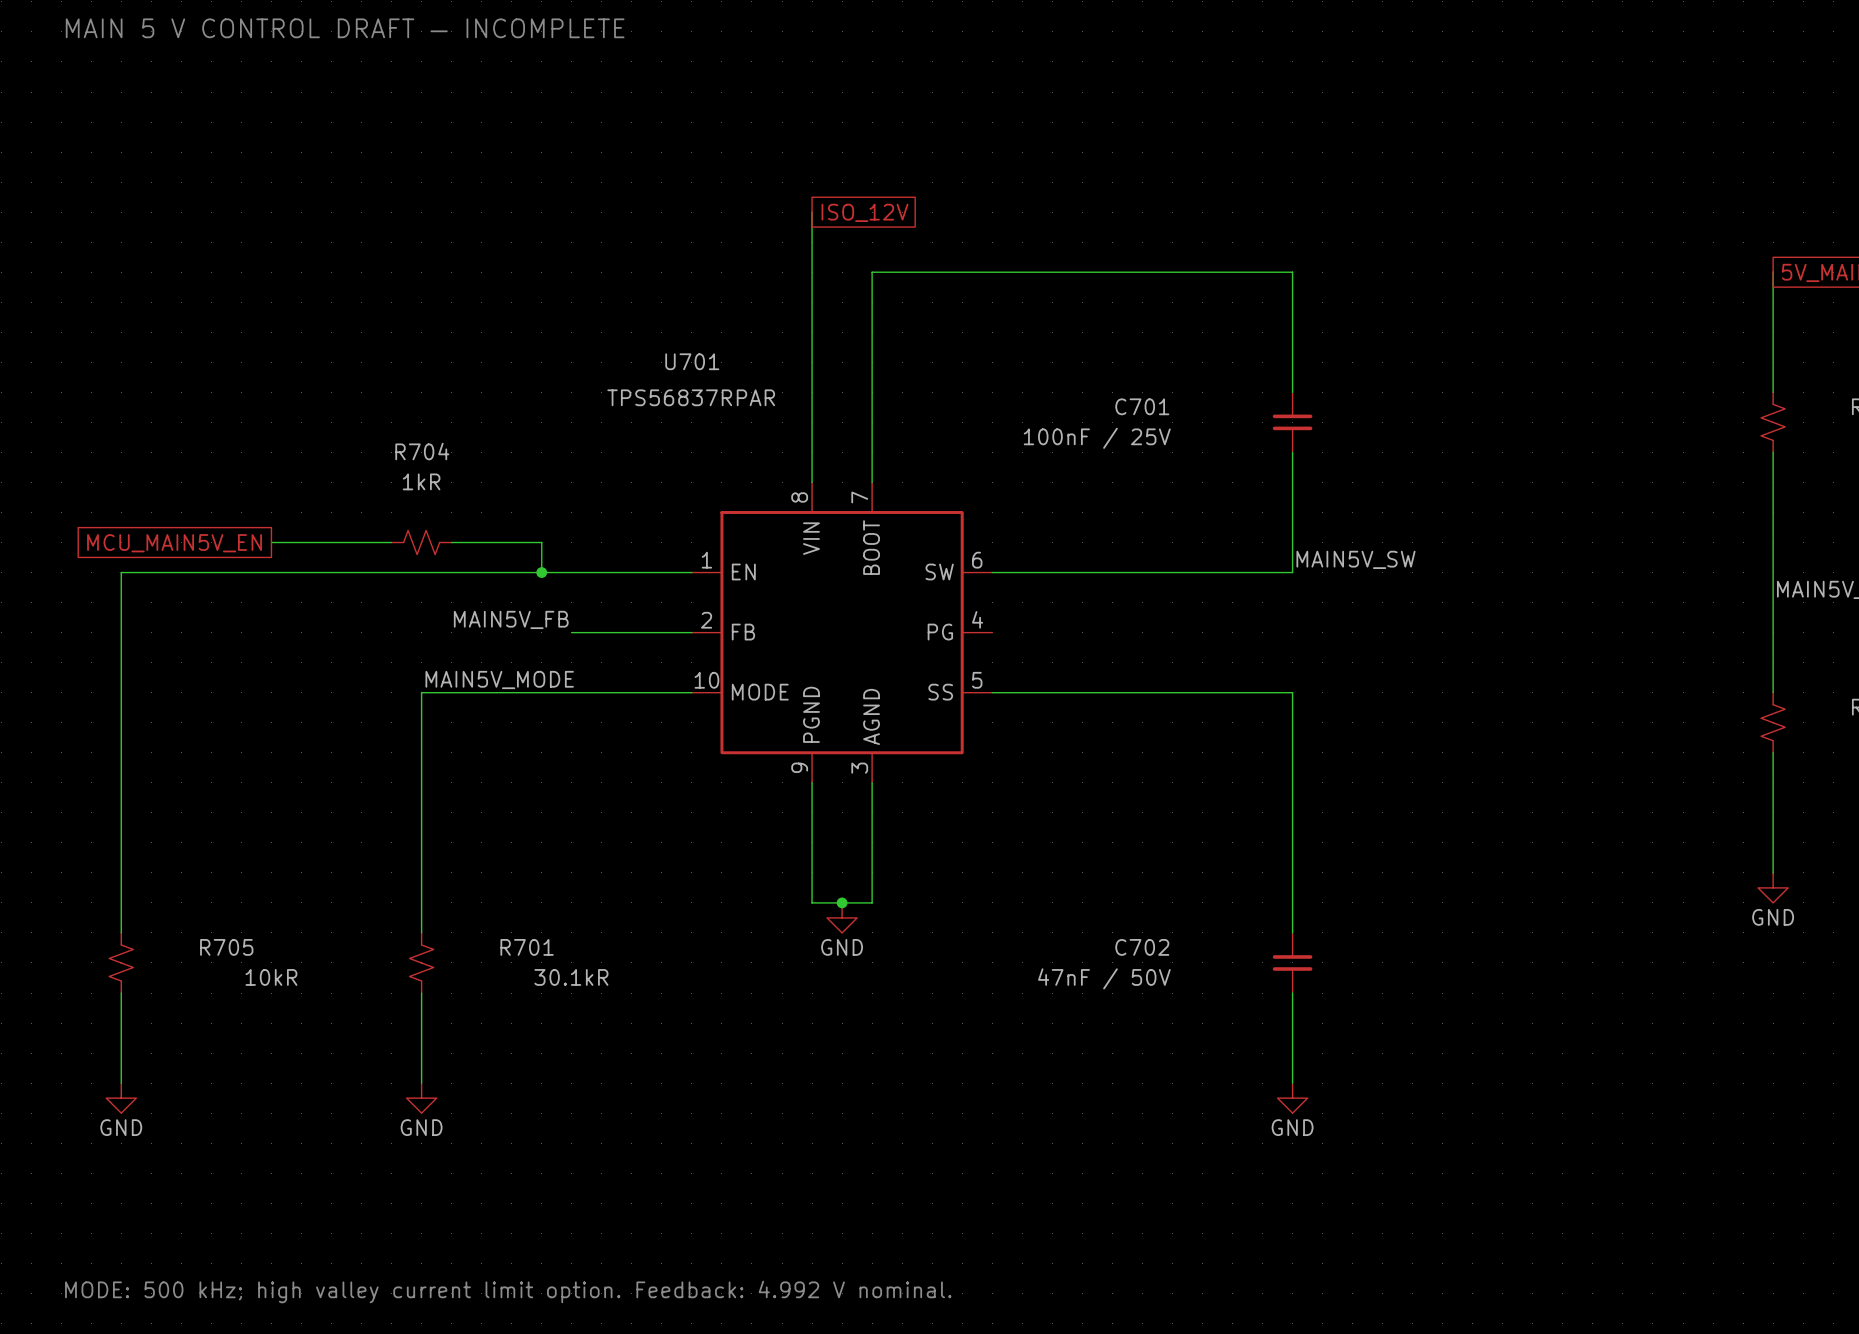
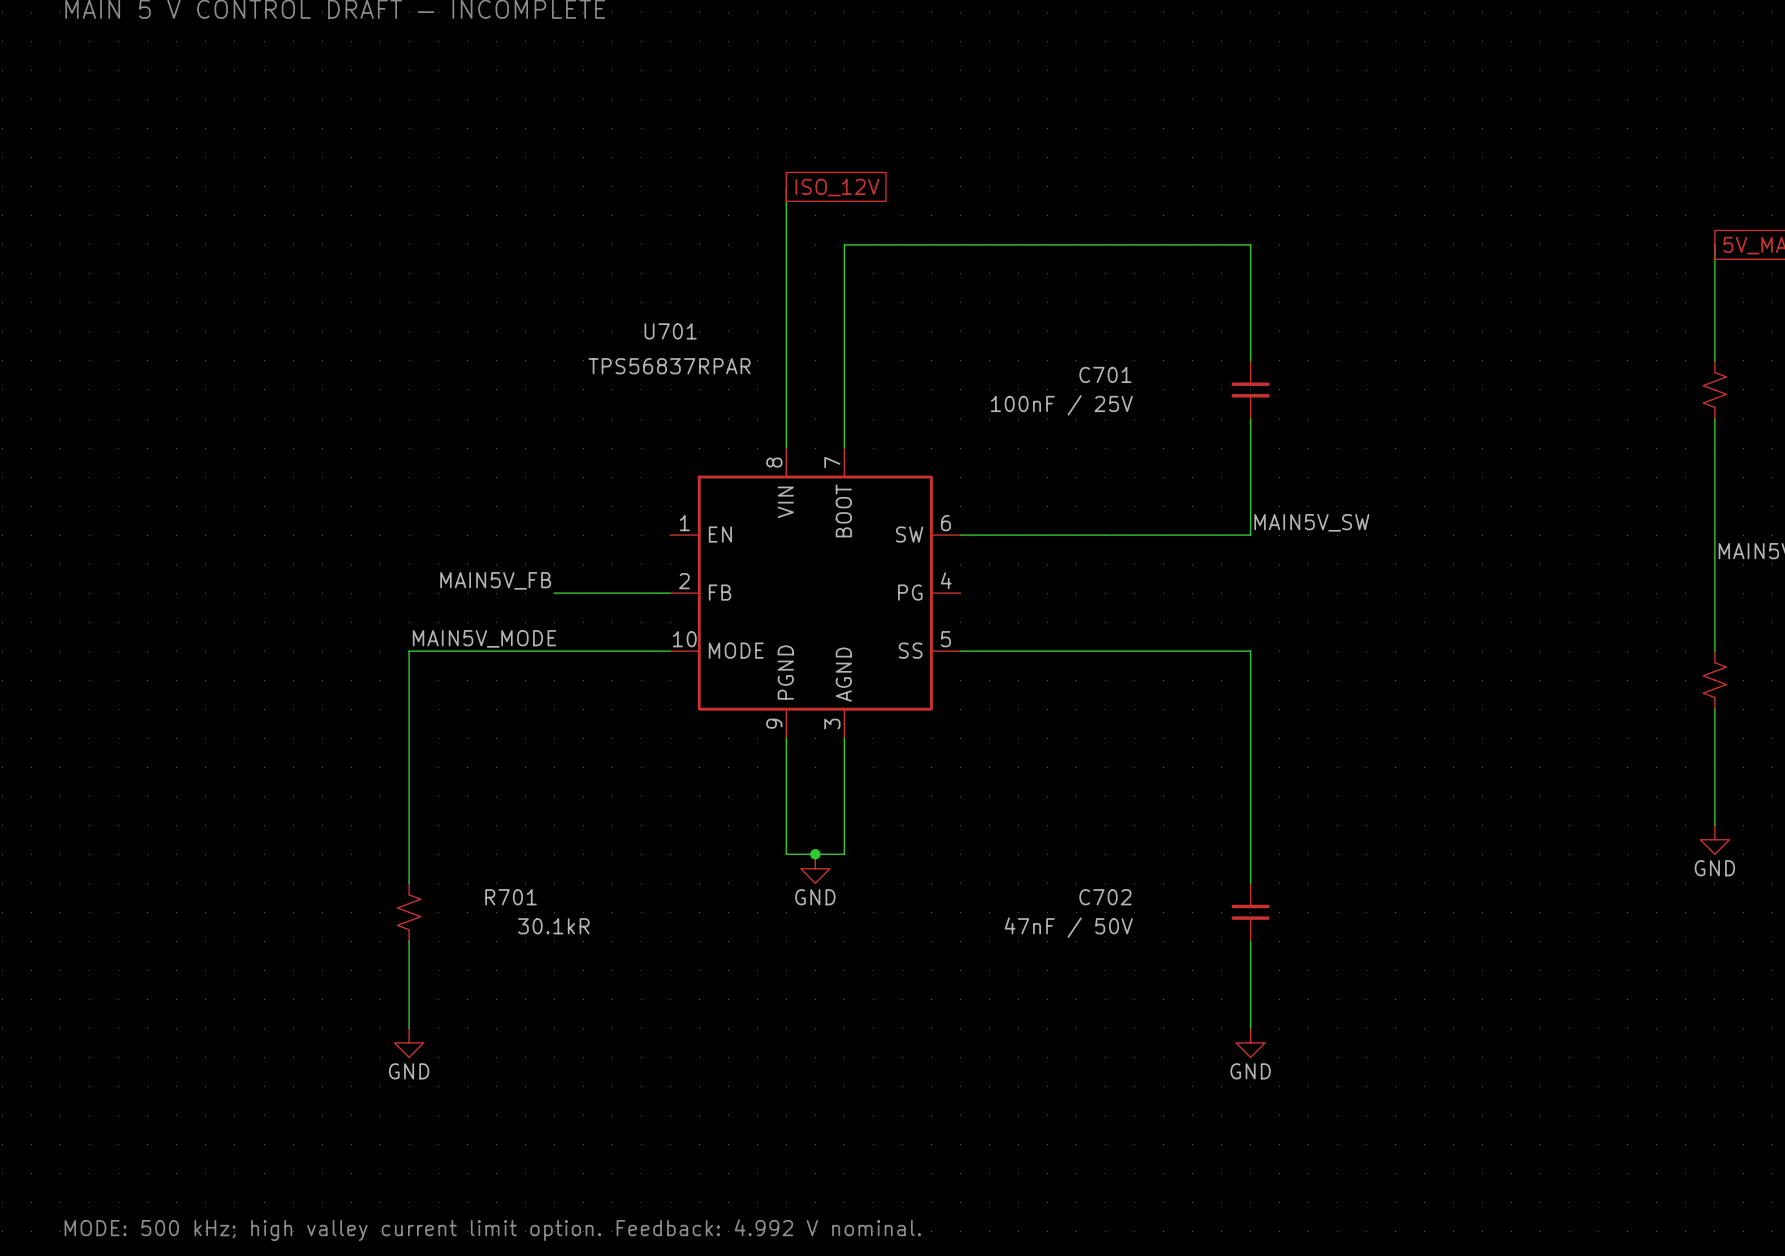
wire: (271, 542) (391, 542) -> none
R704: 1kR (421, 542) -> none
wire: (451, 542) (541, 542) (541, 572) -> none
global label: MCU_MAIN5V_EN (174, 543) -> none
junction: (541, 572) -> none
wire: (691, 572) (121, 572) (121, 932) -> none
R705: 10kR (121, 962) -> none
wire: (121, 993) (121, 1083) -> none
power symbol: GND (121, 1098) -> none

